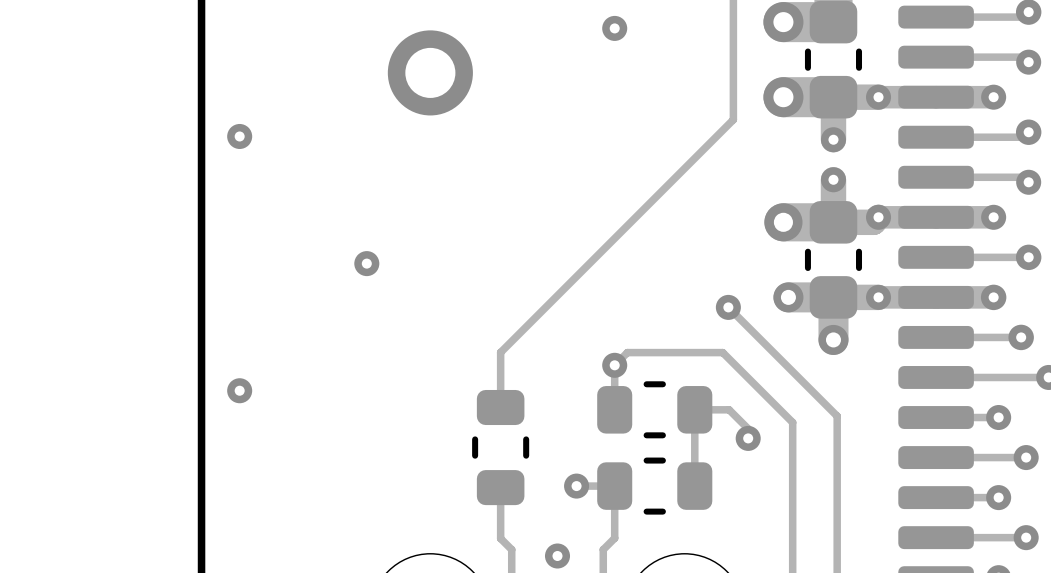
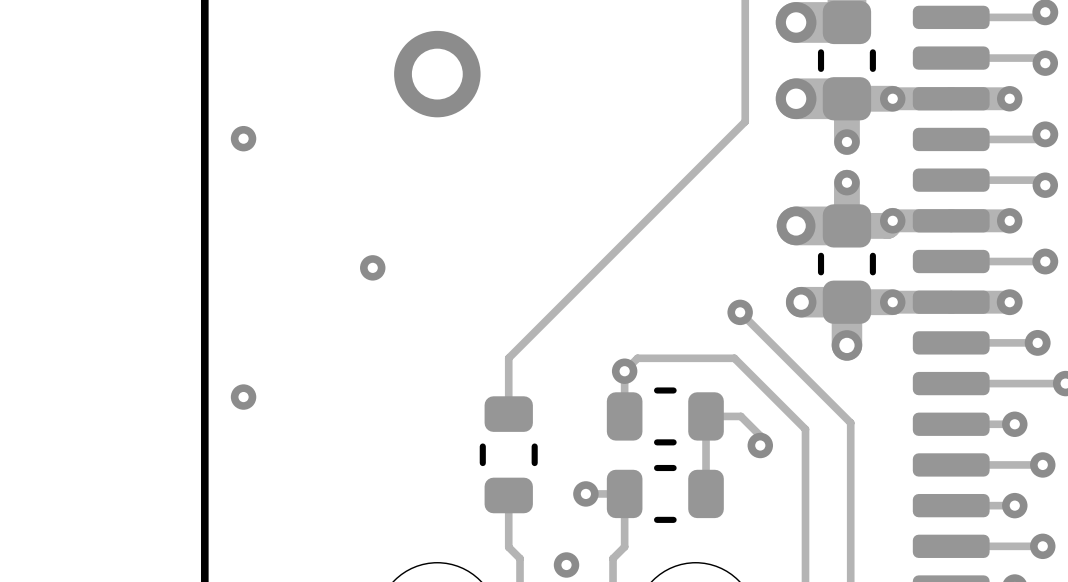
via: (614, 28) -> none

